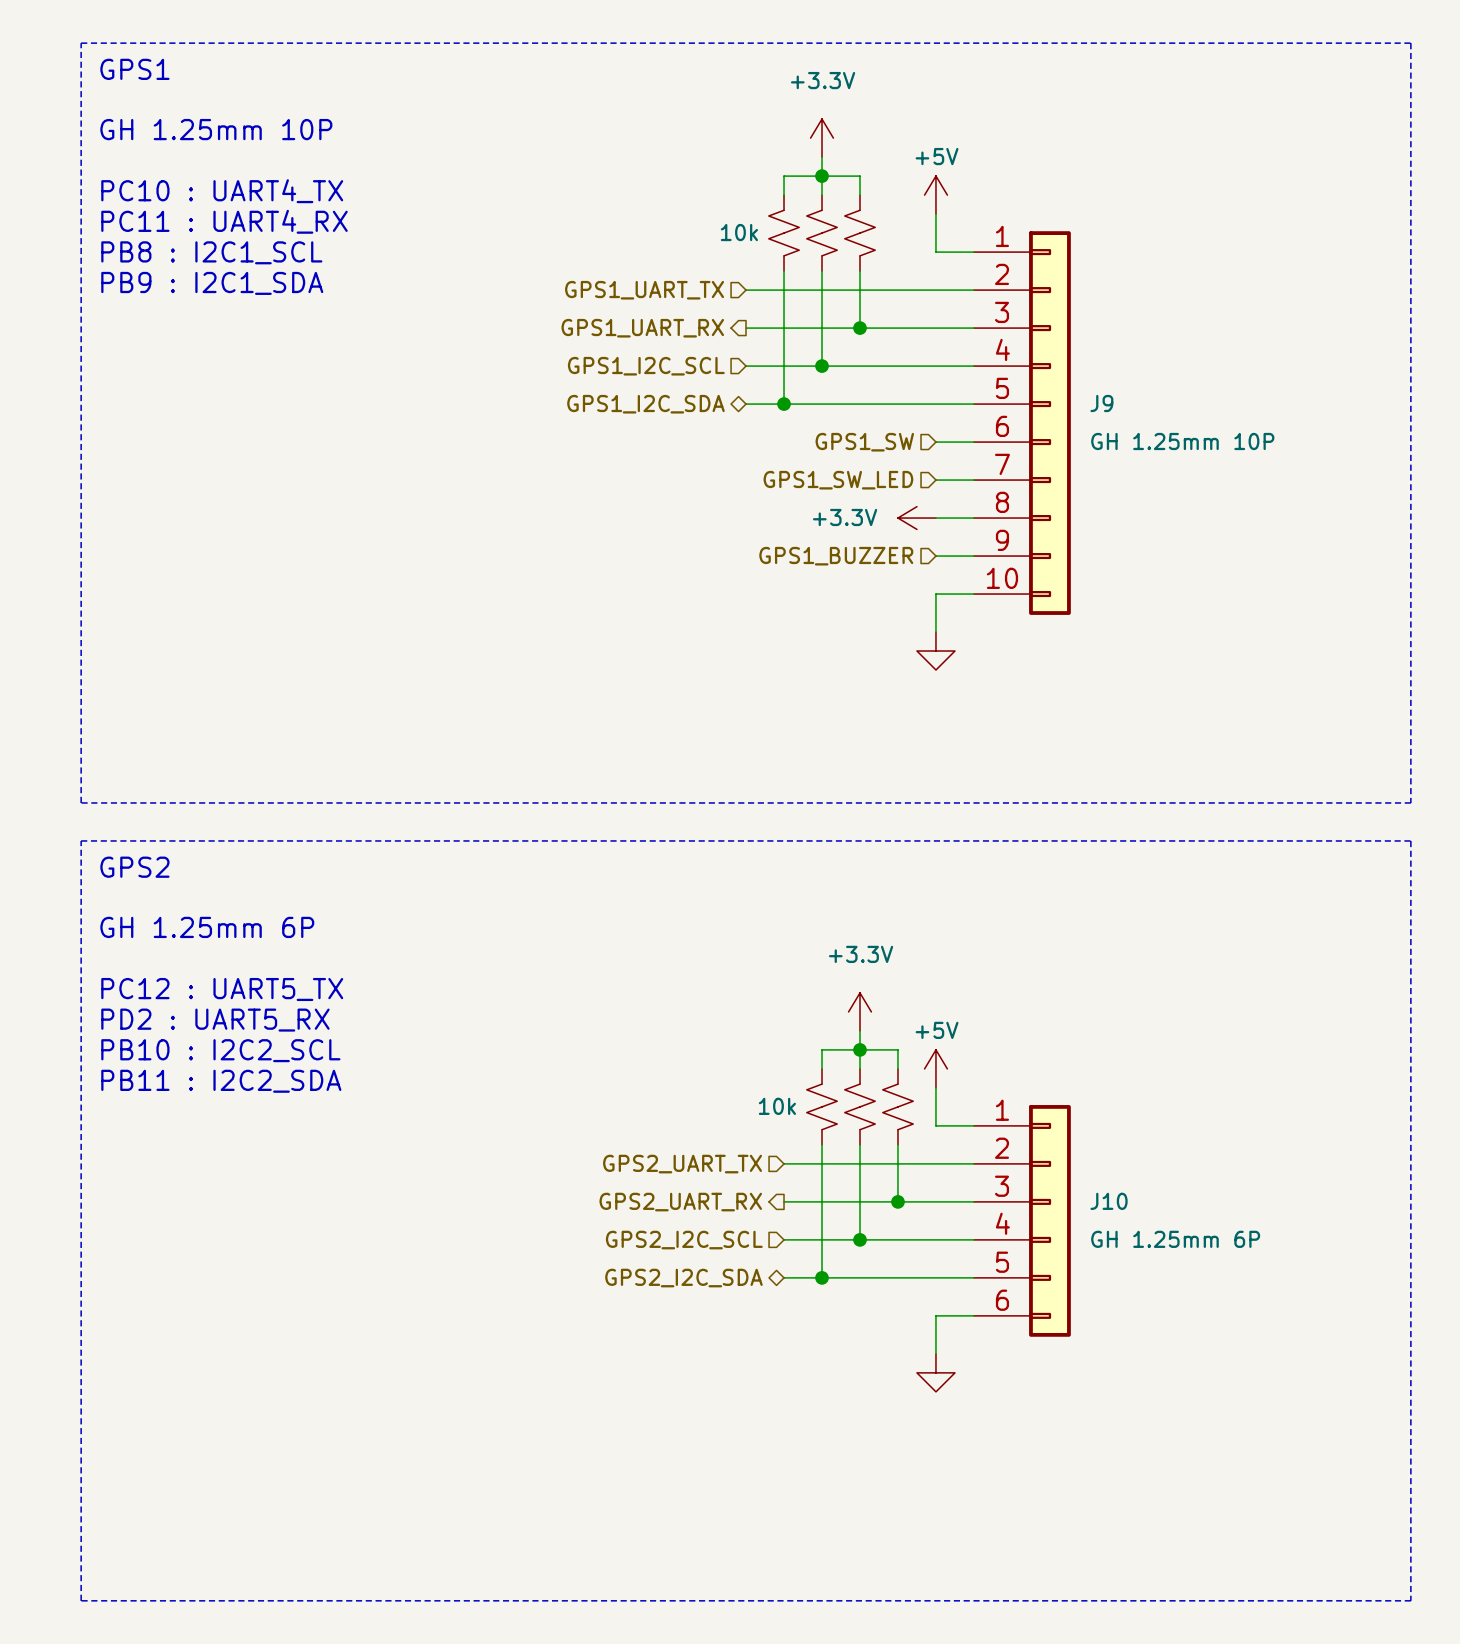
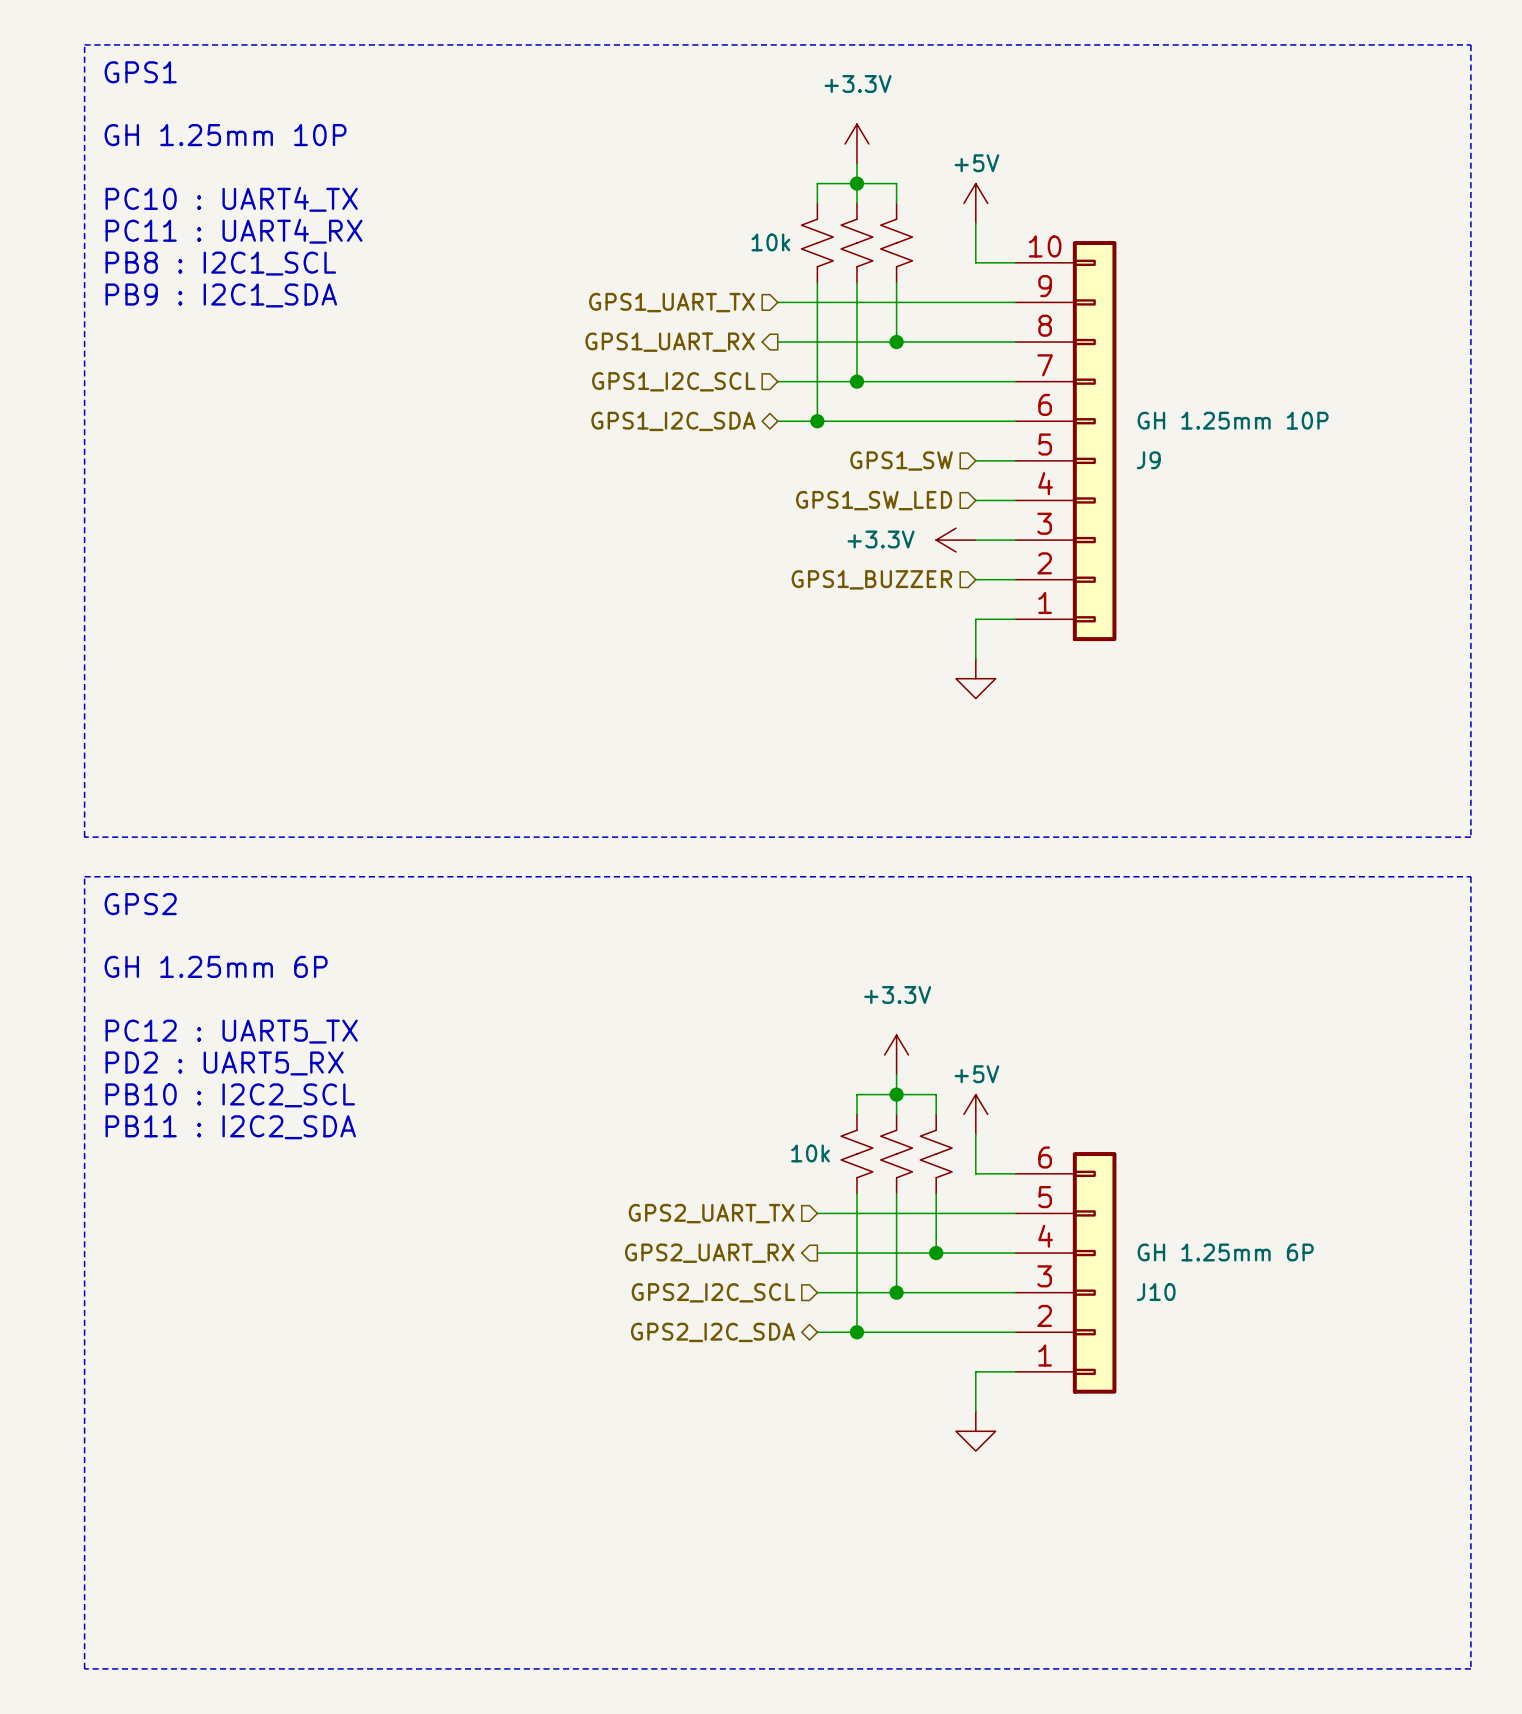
J9 flip: as is (1049, 423) -> up-down (1094, 441)
J10 flip: as is (1049, 1220) -> up-down (1094, 1272)

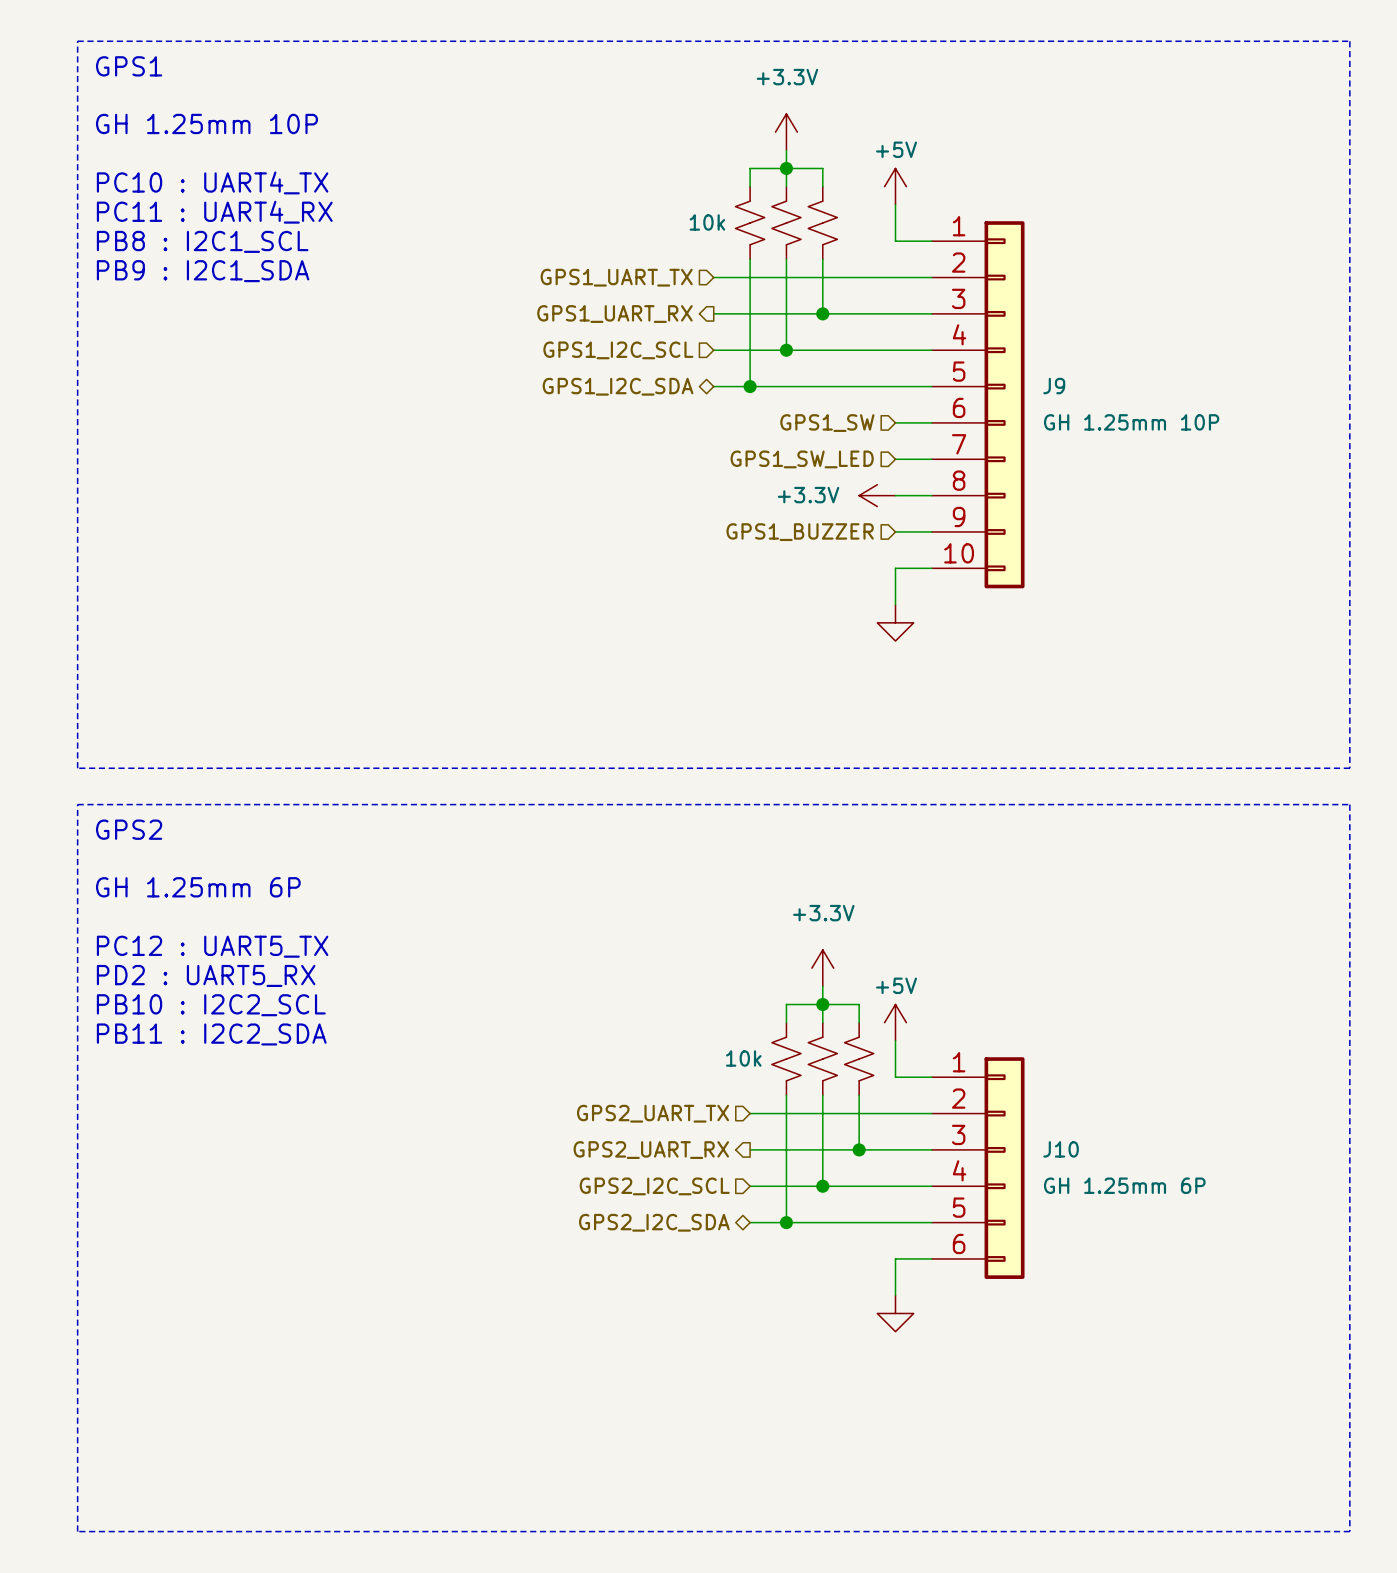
J9 flip: as is (1094, 441) -> up-down (1004, 404)
J10 flip: as is (1094, 1272) -> up-down (1004, 1168)

